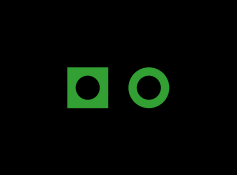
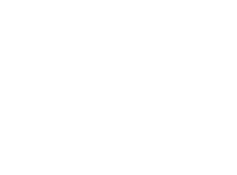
part: (118, 87) -> none

